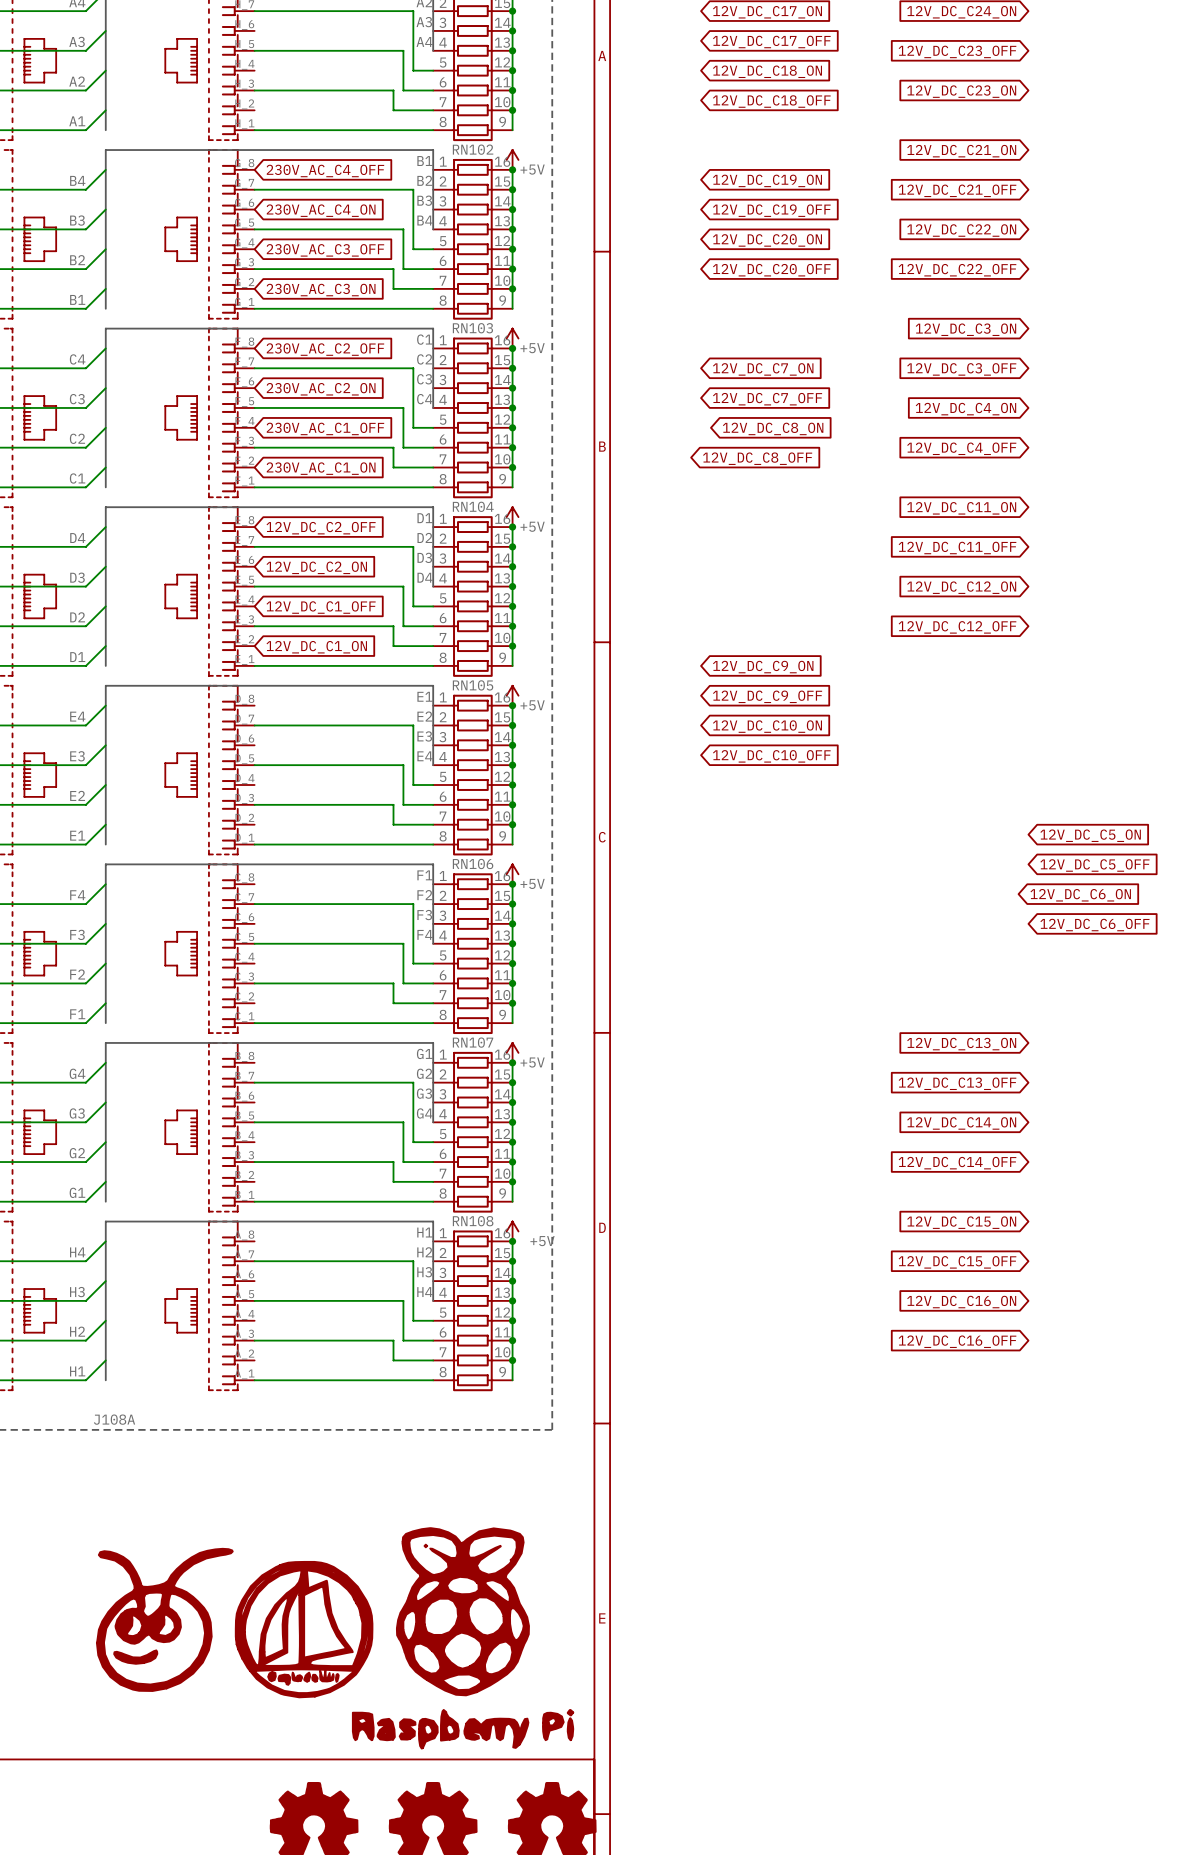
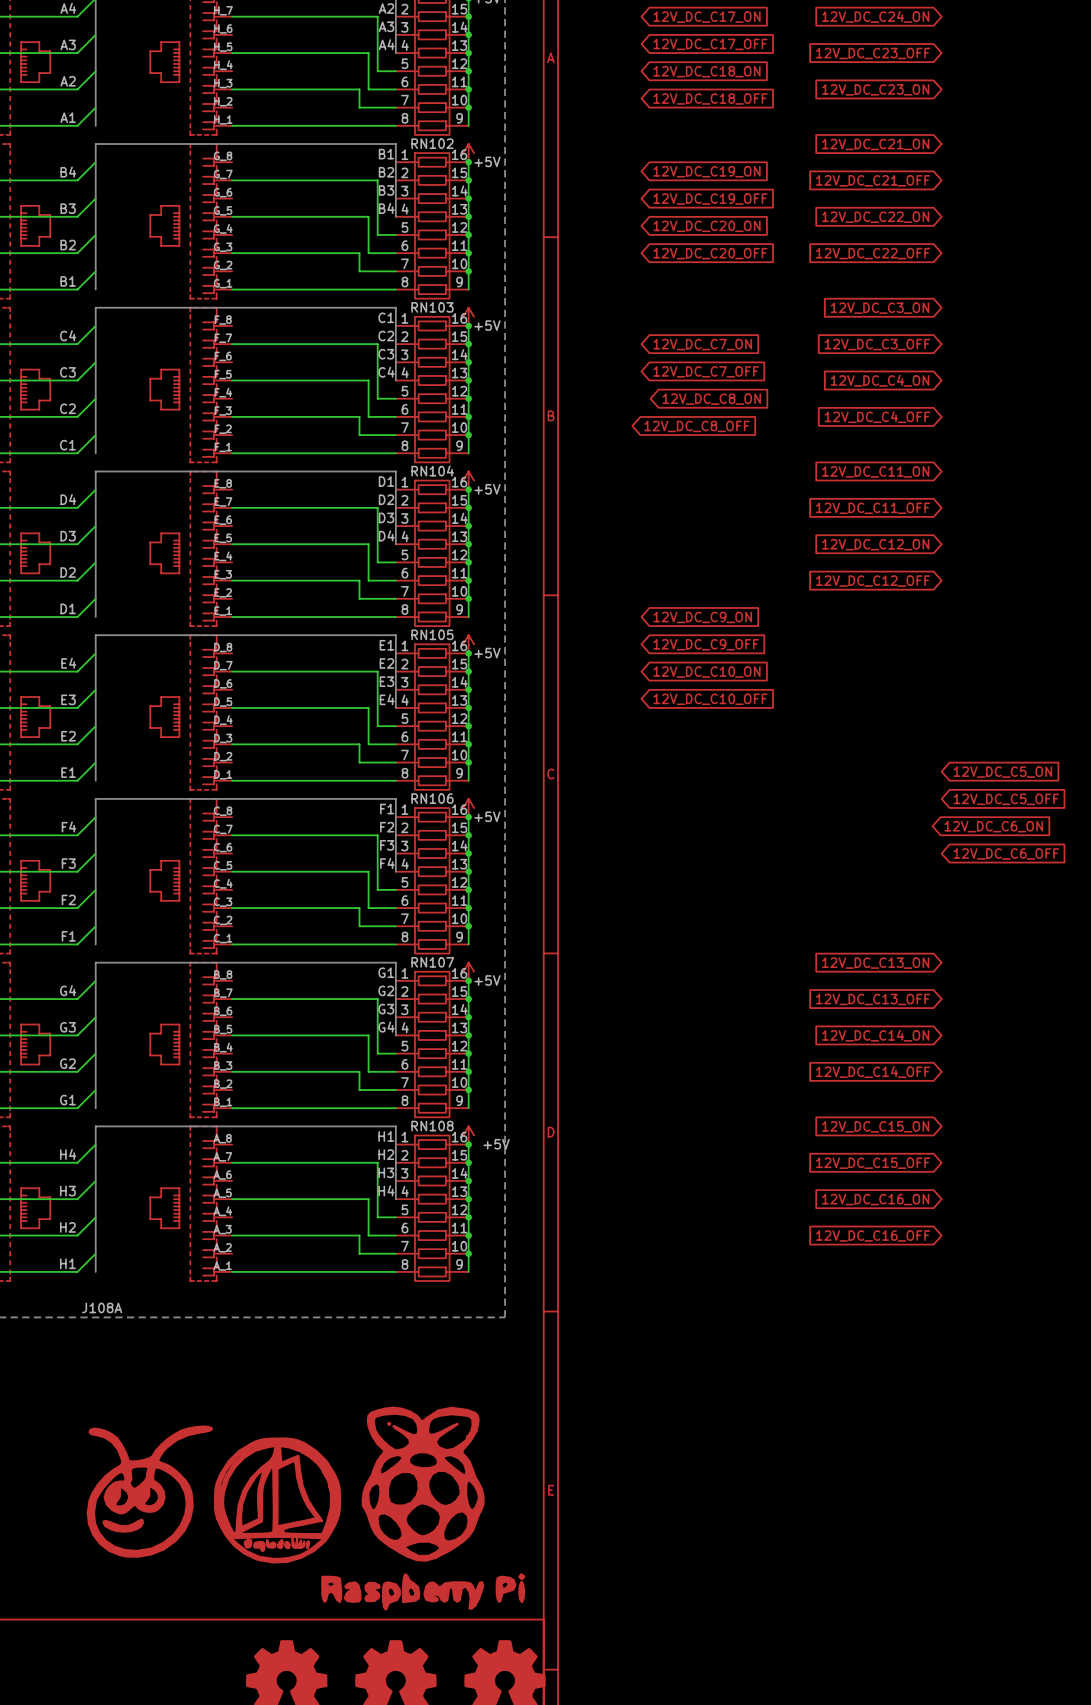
global label: 230V_AC_C4_OFF (325, 170) -> none
global label: 230V_AC_C4_ON (321, 210) -> none
global label: 230V_AC_C3_OFF (325, 250) -> none
global label: 230V_AC_C3_ON (321, 290) -> none
global label: 230V_AC_C2_OFF (325, 349) -> none
global label: 230V_AC_C2_ON (321, 389) -> none
global label: 230V_AC_C1_OFF (325, 428) -> none
global label: 230V_AC_C1_ON (321, 468) -> none
global label: 12V_DC_C2_OFF (321, 528) -> none
global label: 12V_DC_C2_ON (316, 567) -> none
global label: 12V_DC_C1_OFF (321, 607) -> none
global label: 12V_DC_C1_ON (316, 647) -> none

